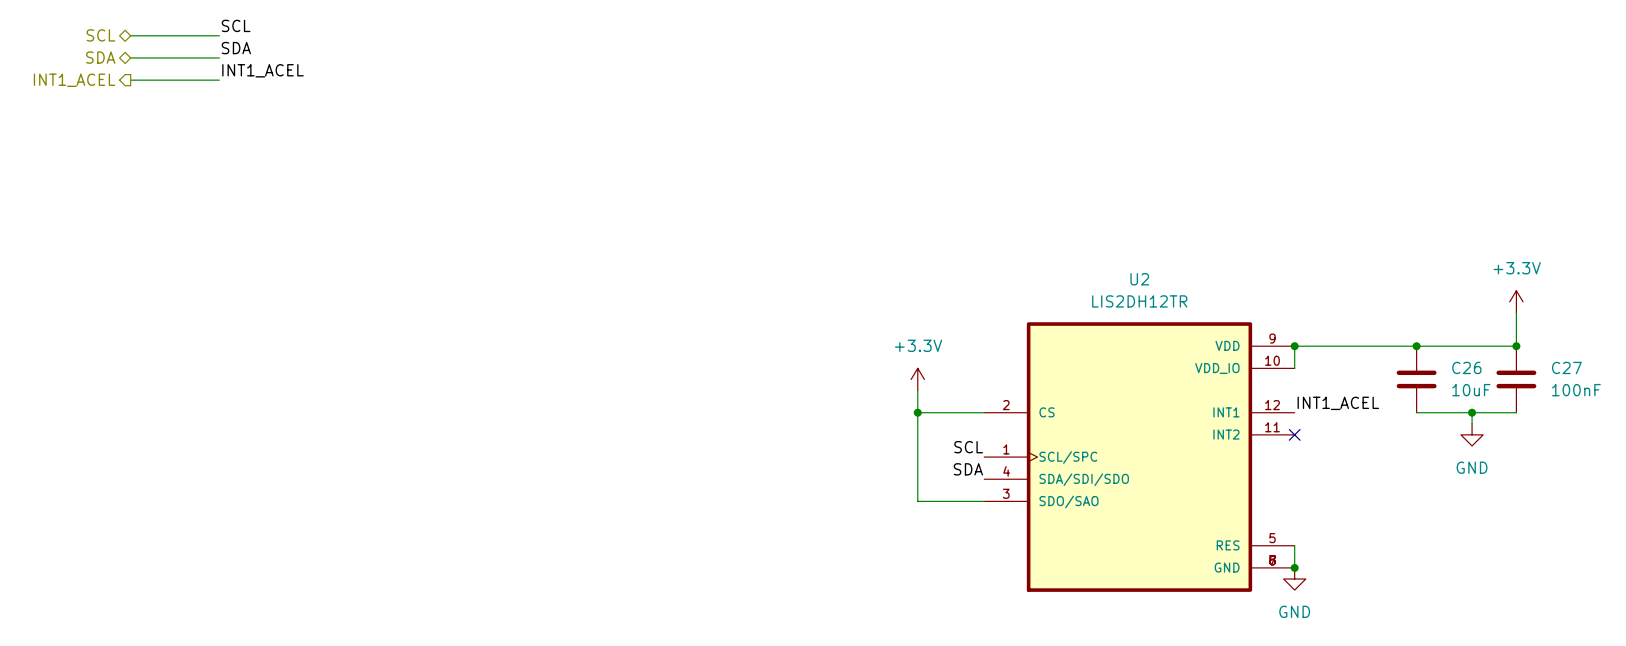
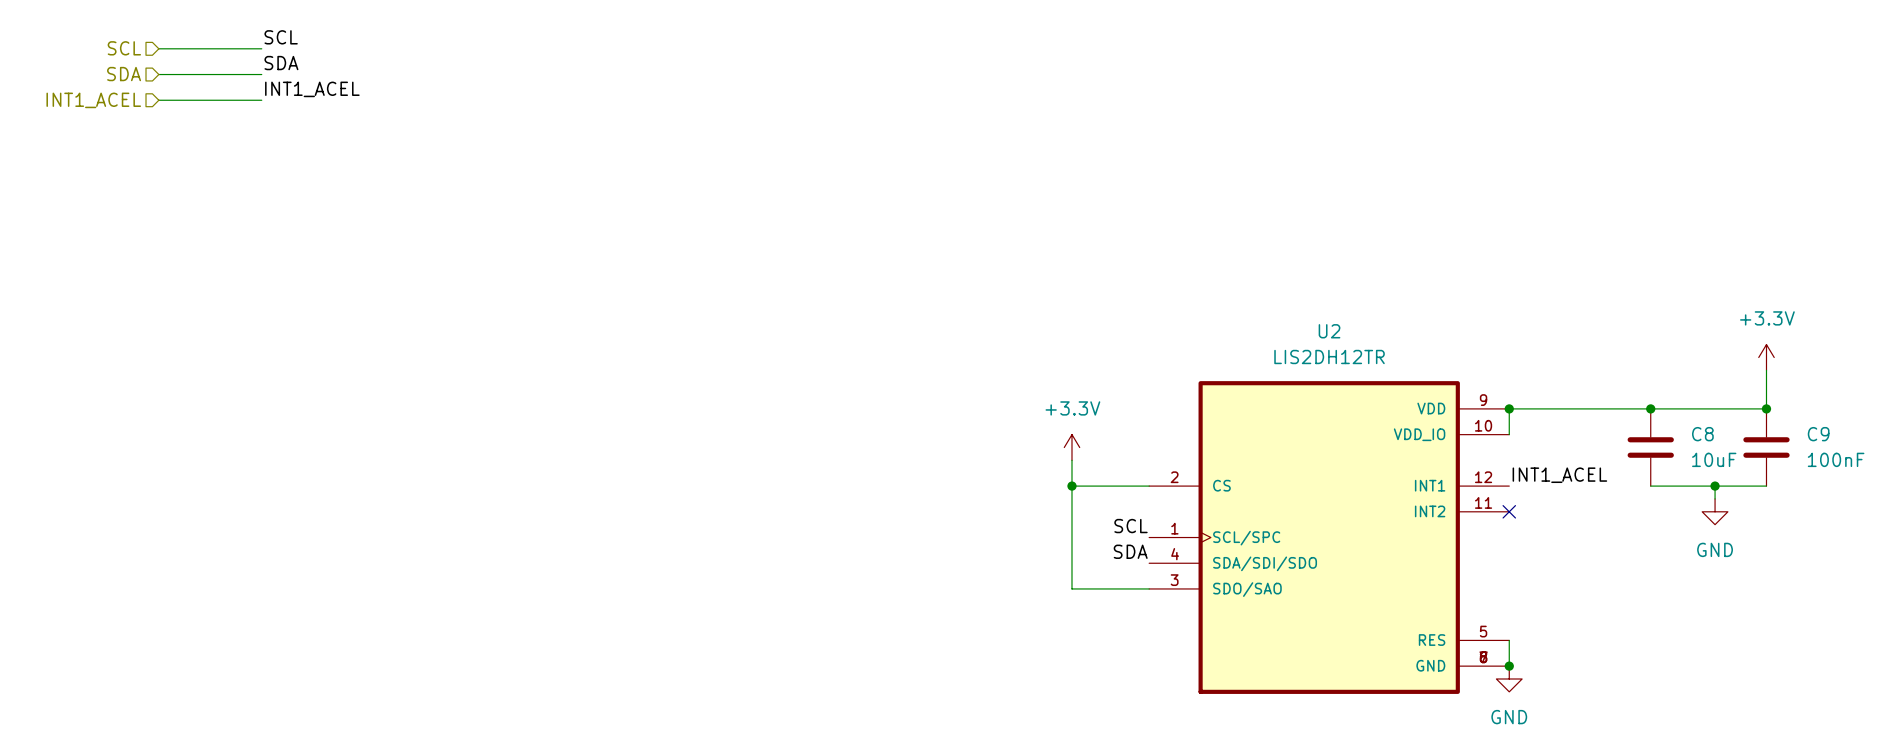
hierarchical label shape: bidirectional (100, 35) -> input (124, 48)
hierarchical label shape: bidirectional (100, 57) -> input (124, 74)
hierarchical label shape: output (74, 80) -> input (93, 100)
C26 name: C26 (1466, 367) -> C8 (1702, 434)
C27 name: C27 (1566, 367) -> C9 (1818, 434)

